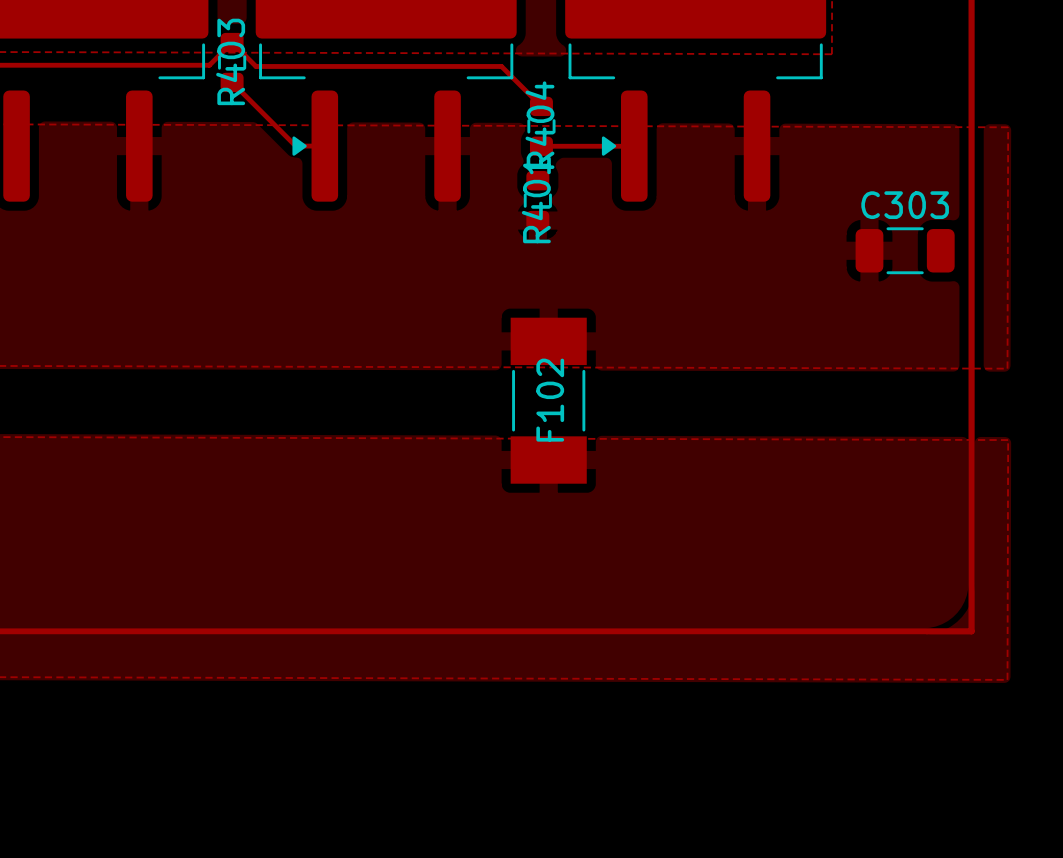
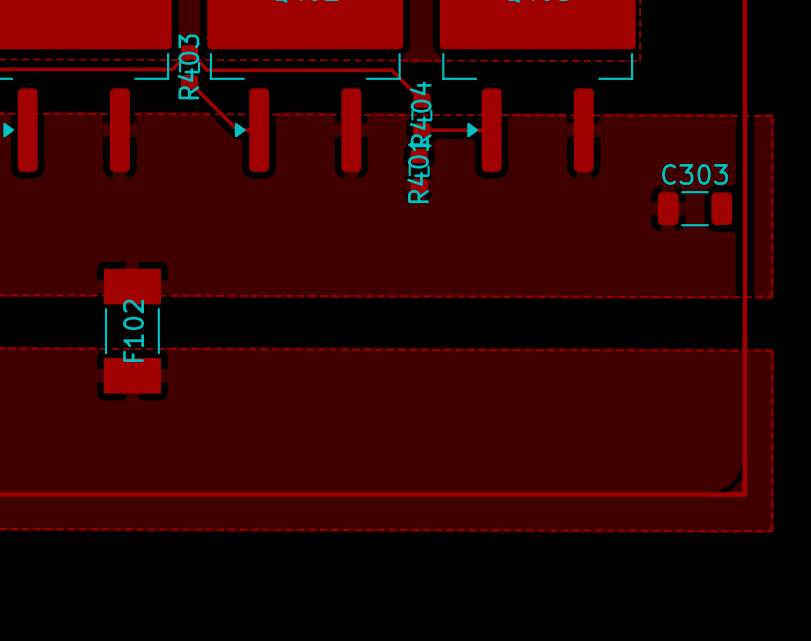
F102 position: (548, 400) -> (132, 331)

